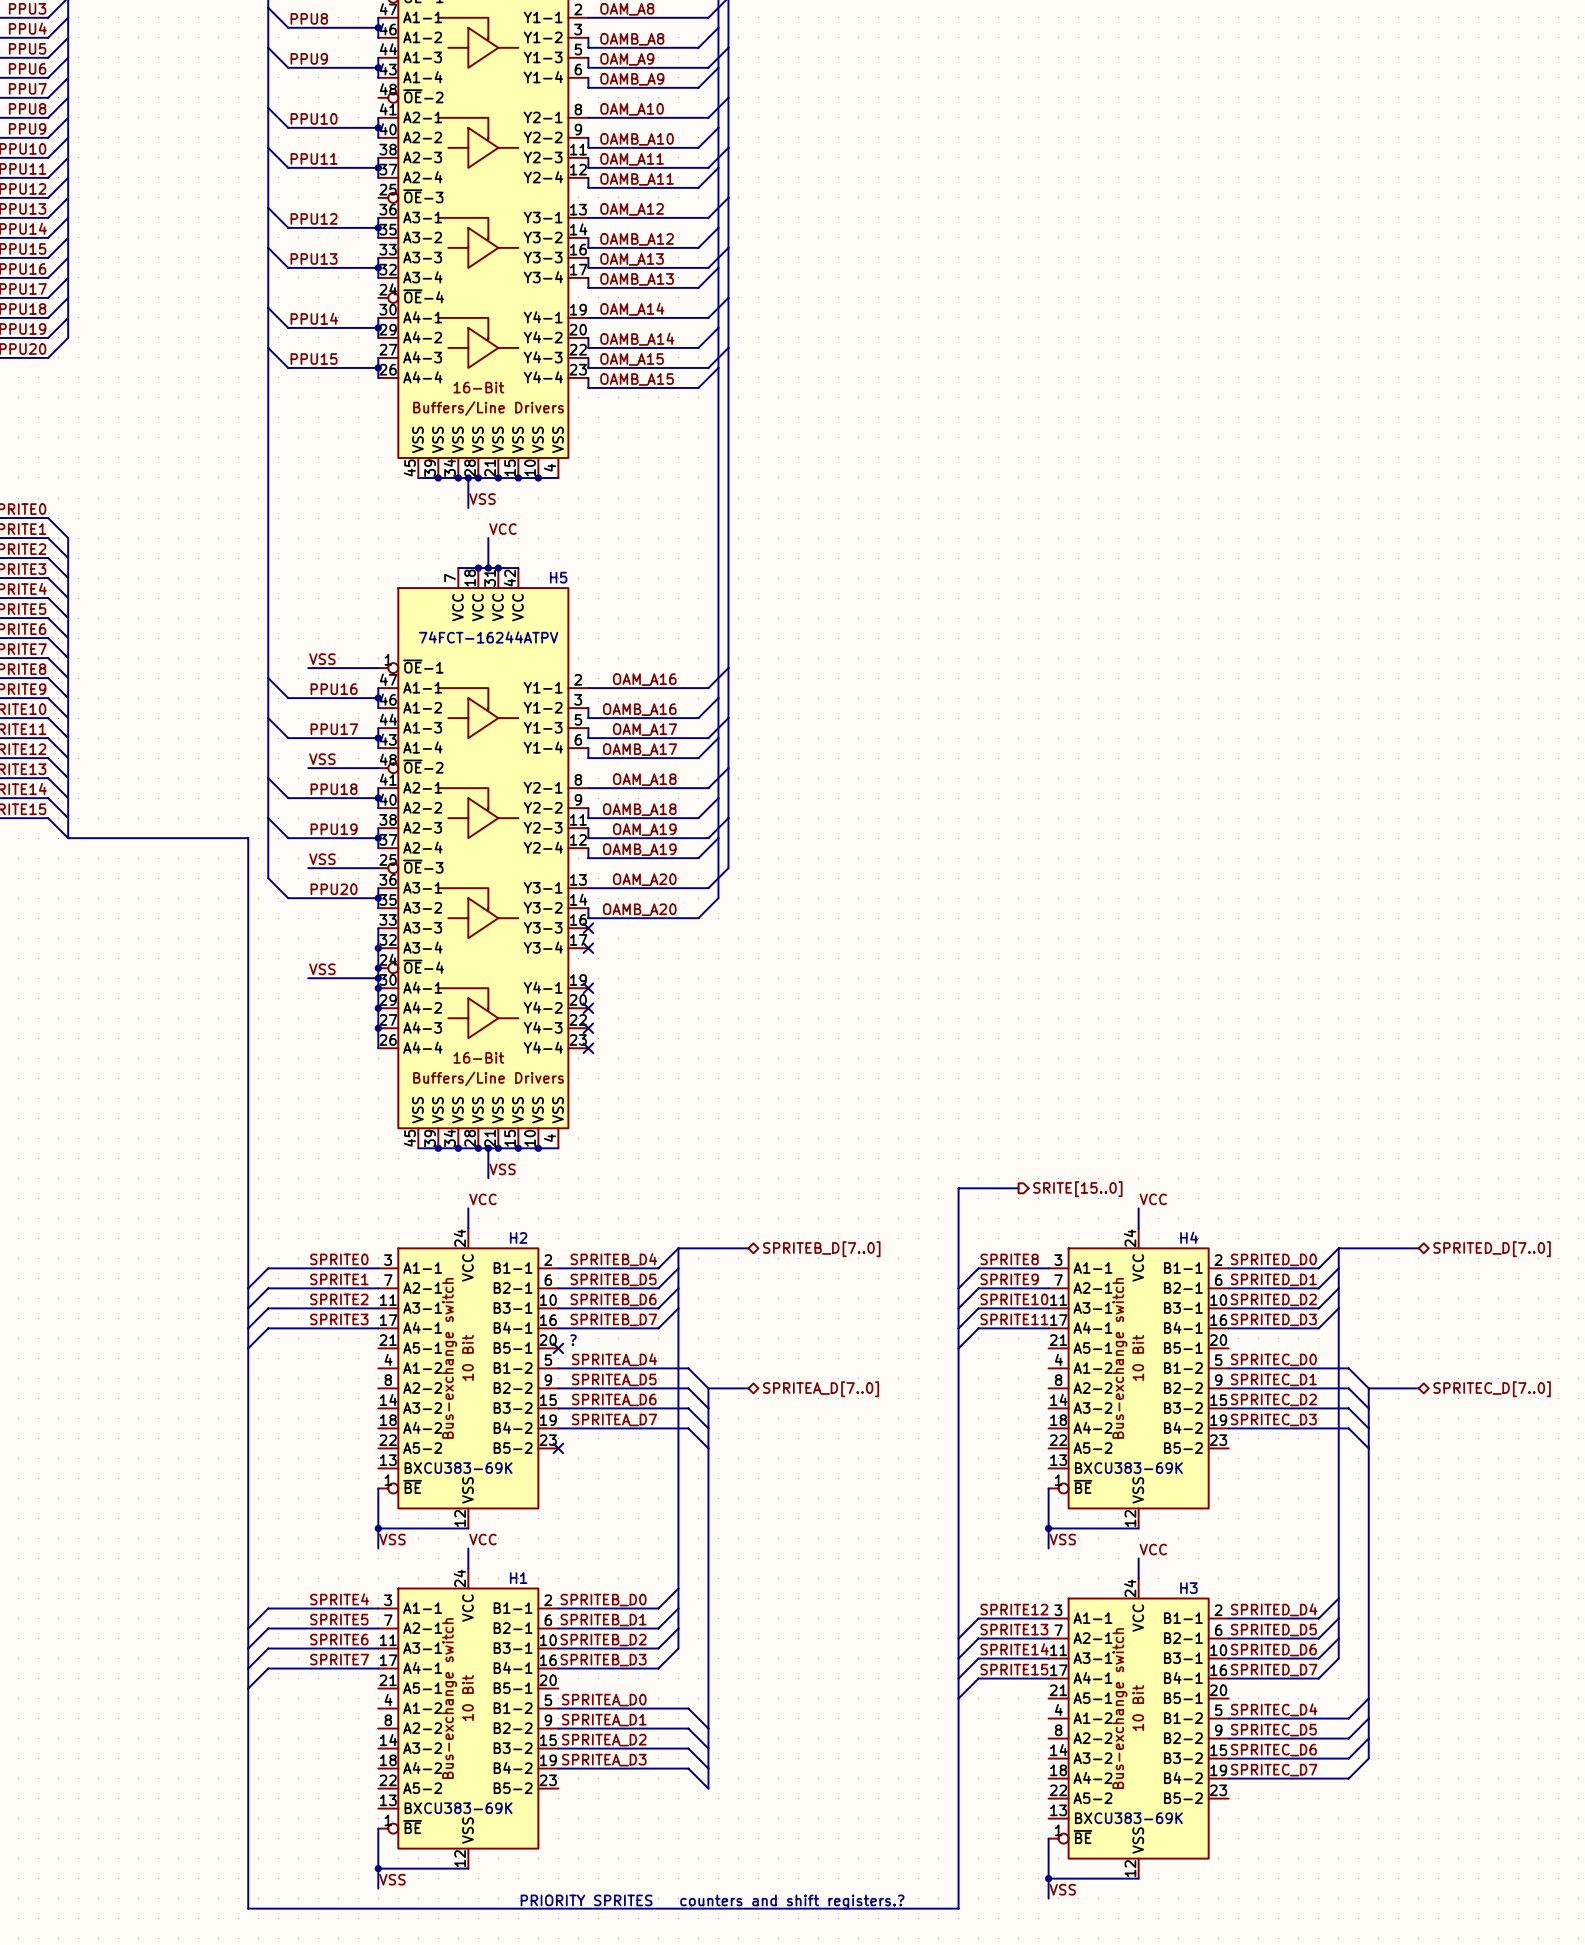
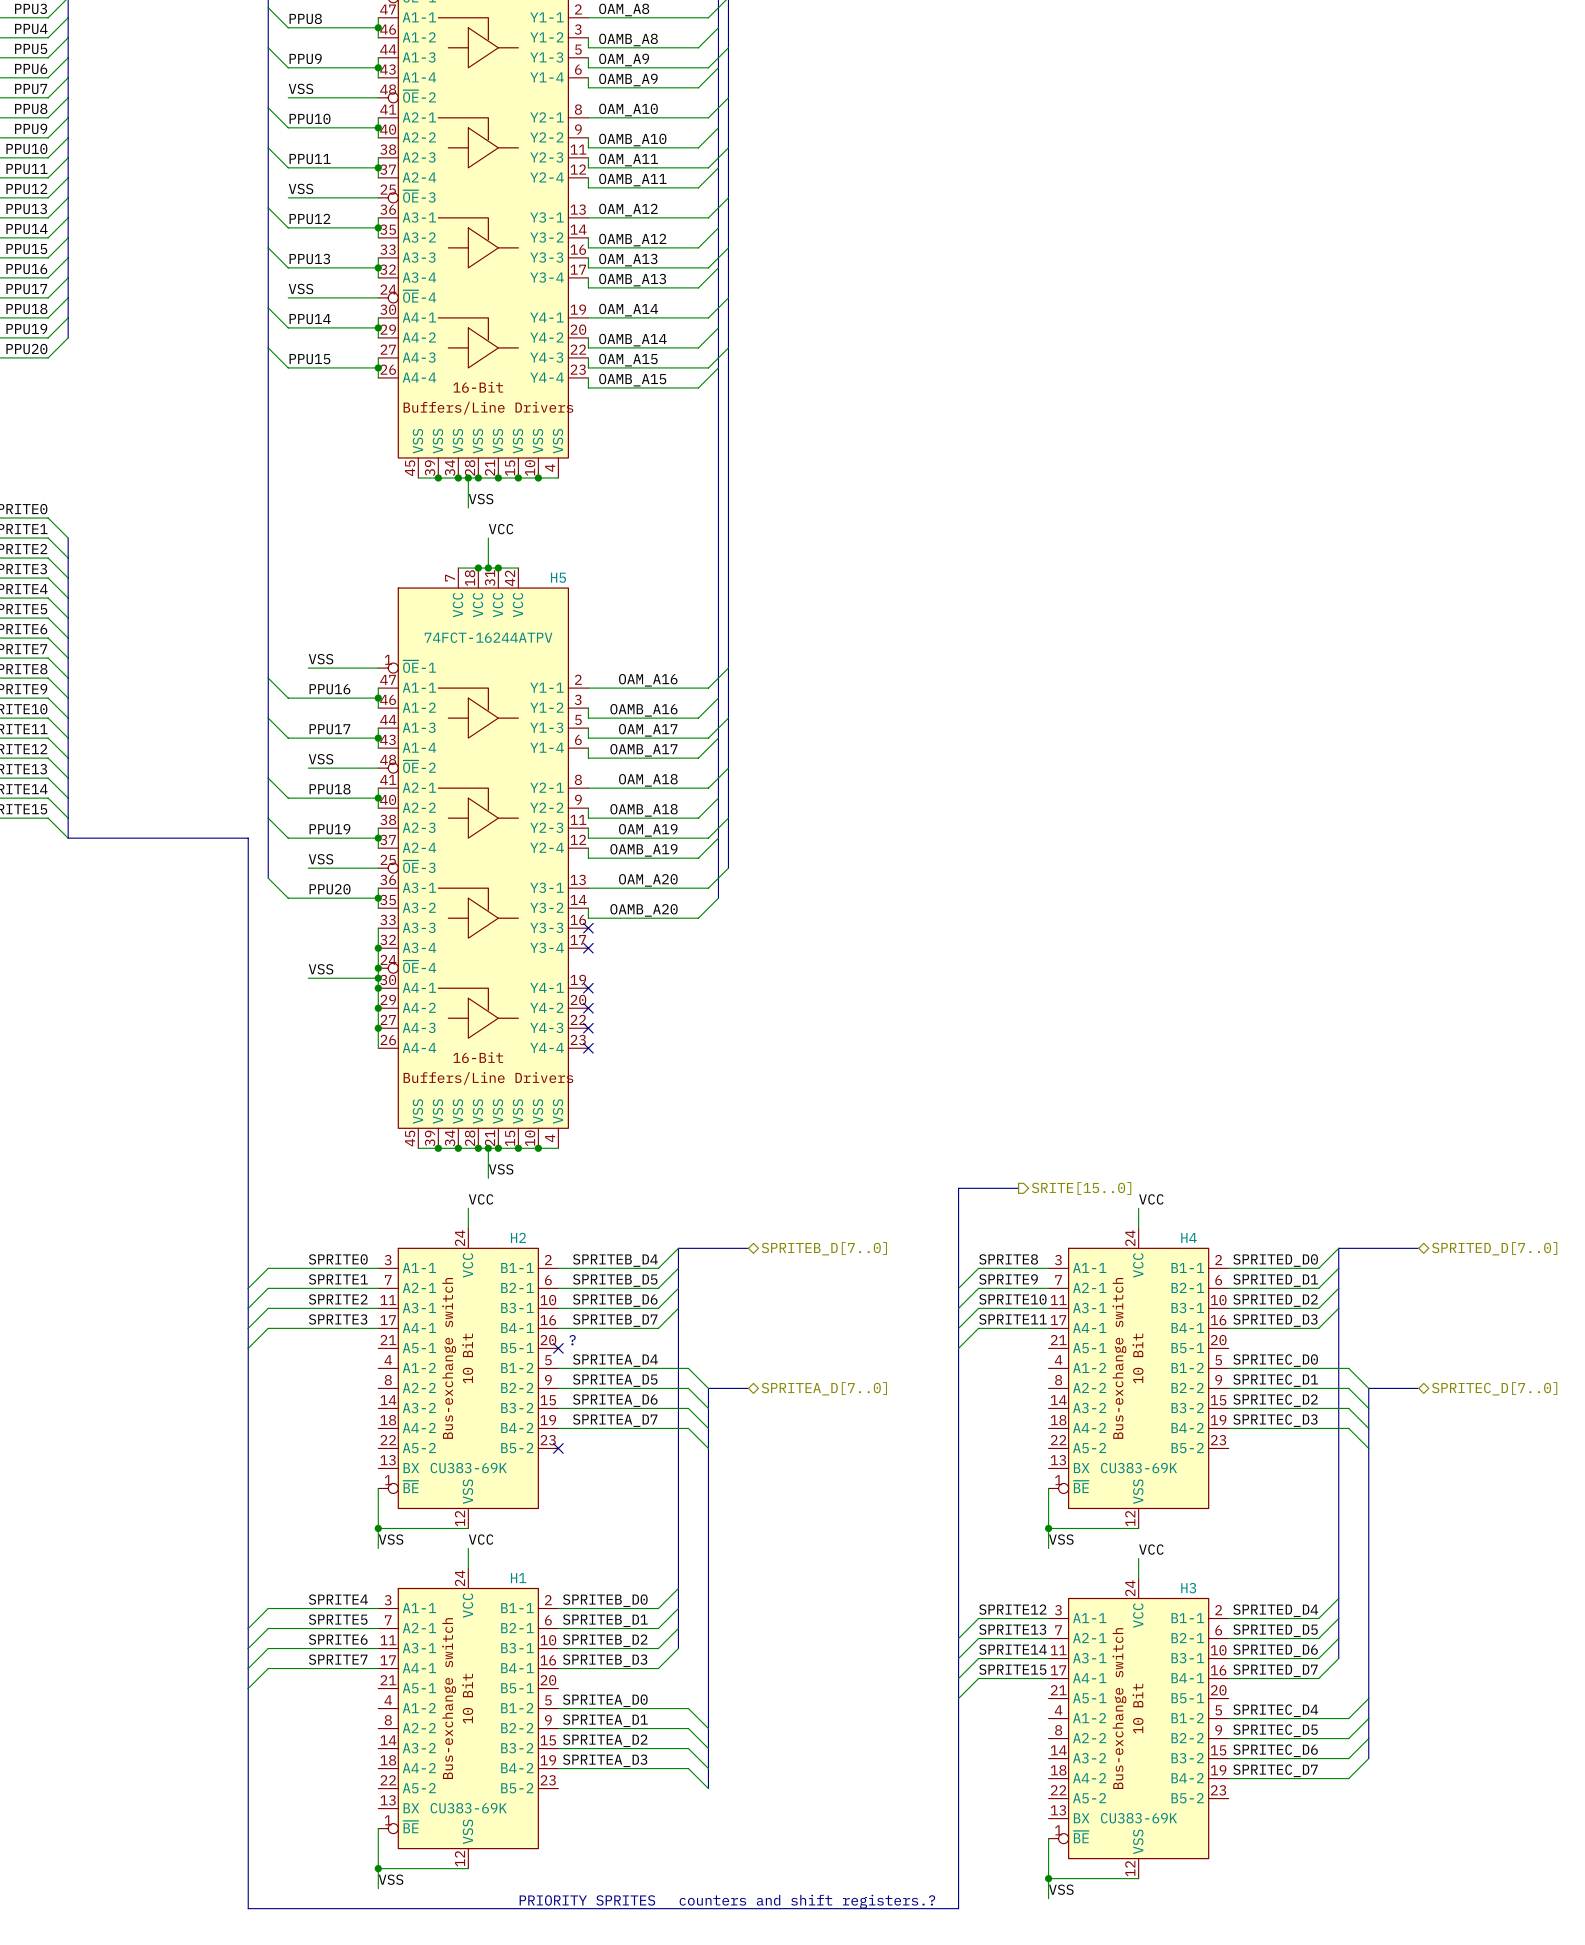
label: none -> VSS (301, 88)
wire: none -> (288, 97) (378, 97)
label: none -> VSS (301, 188)
wire: none -> (288, 197) (378, 197)
label: none -> VSS (301, 288)
wire: none -> (288, 297) (378, 297)

